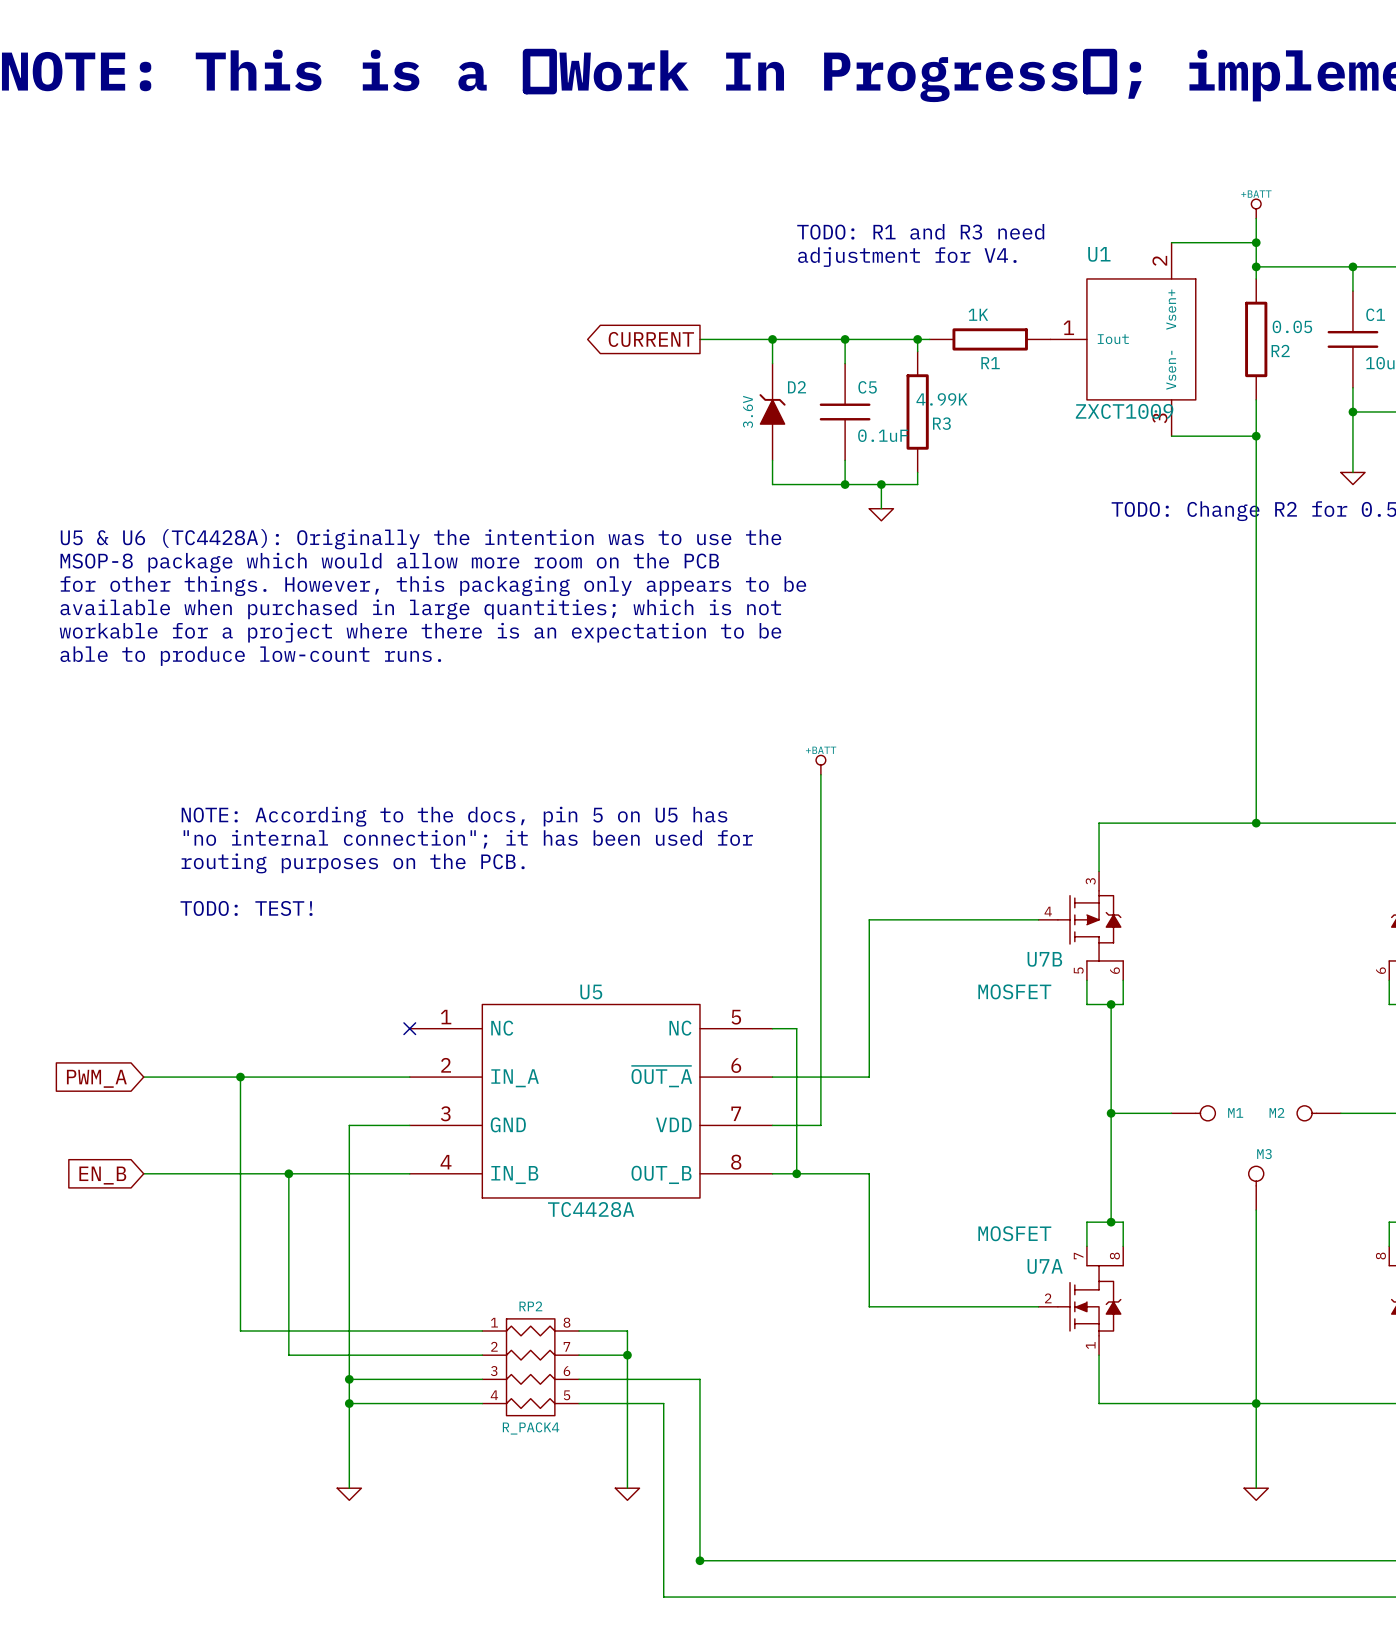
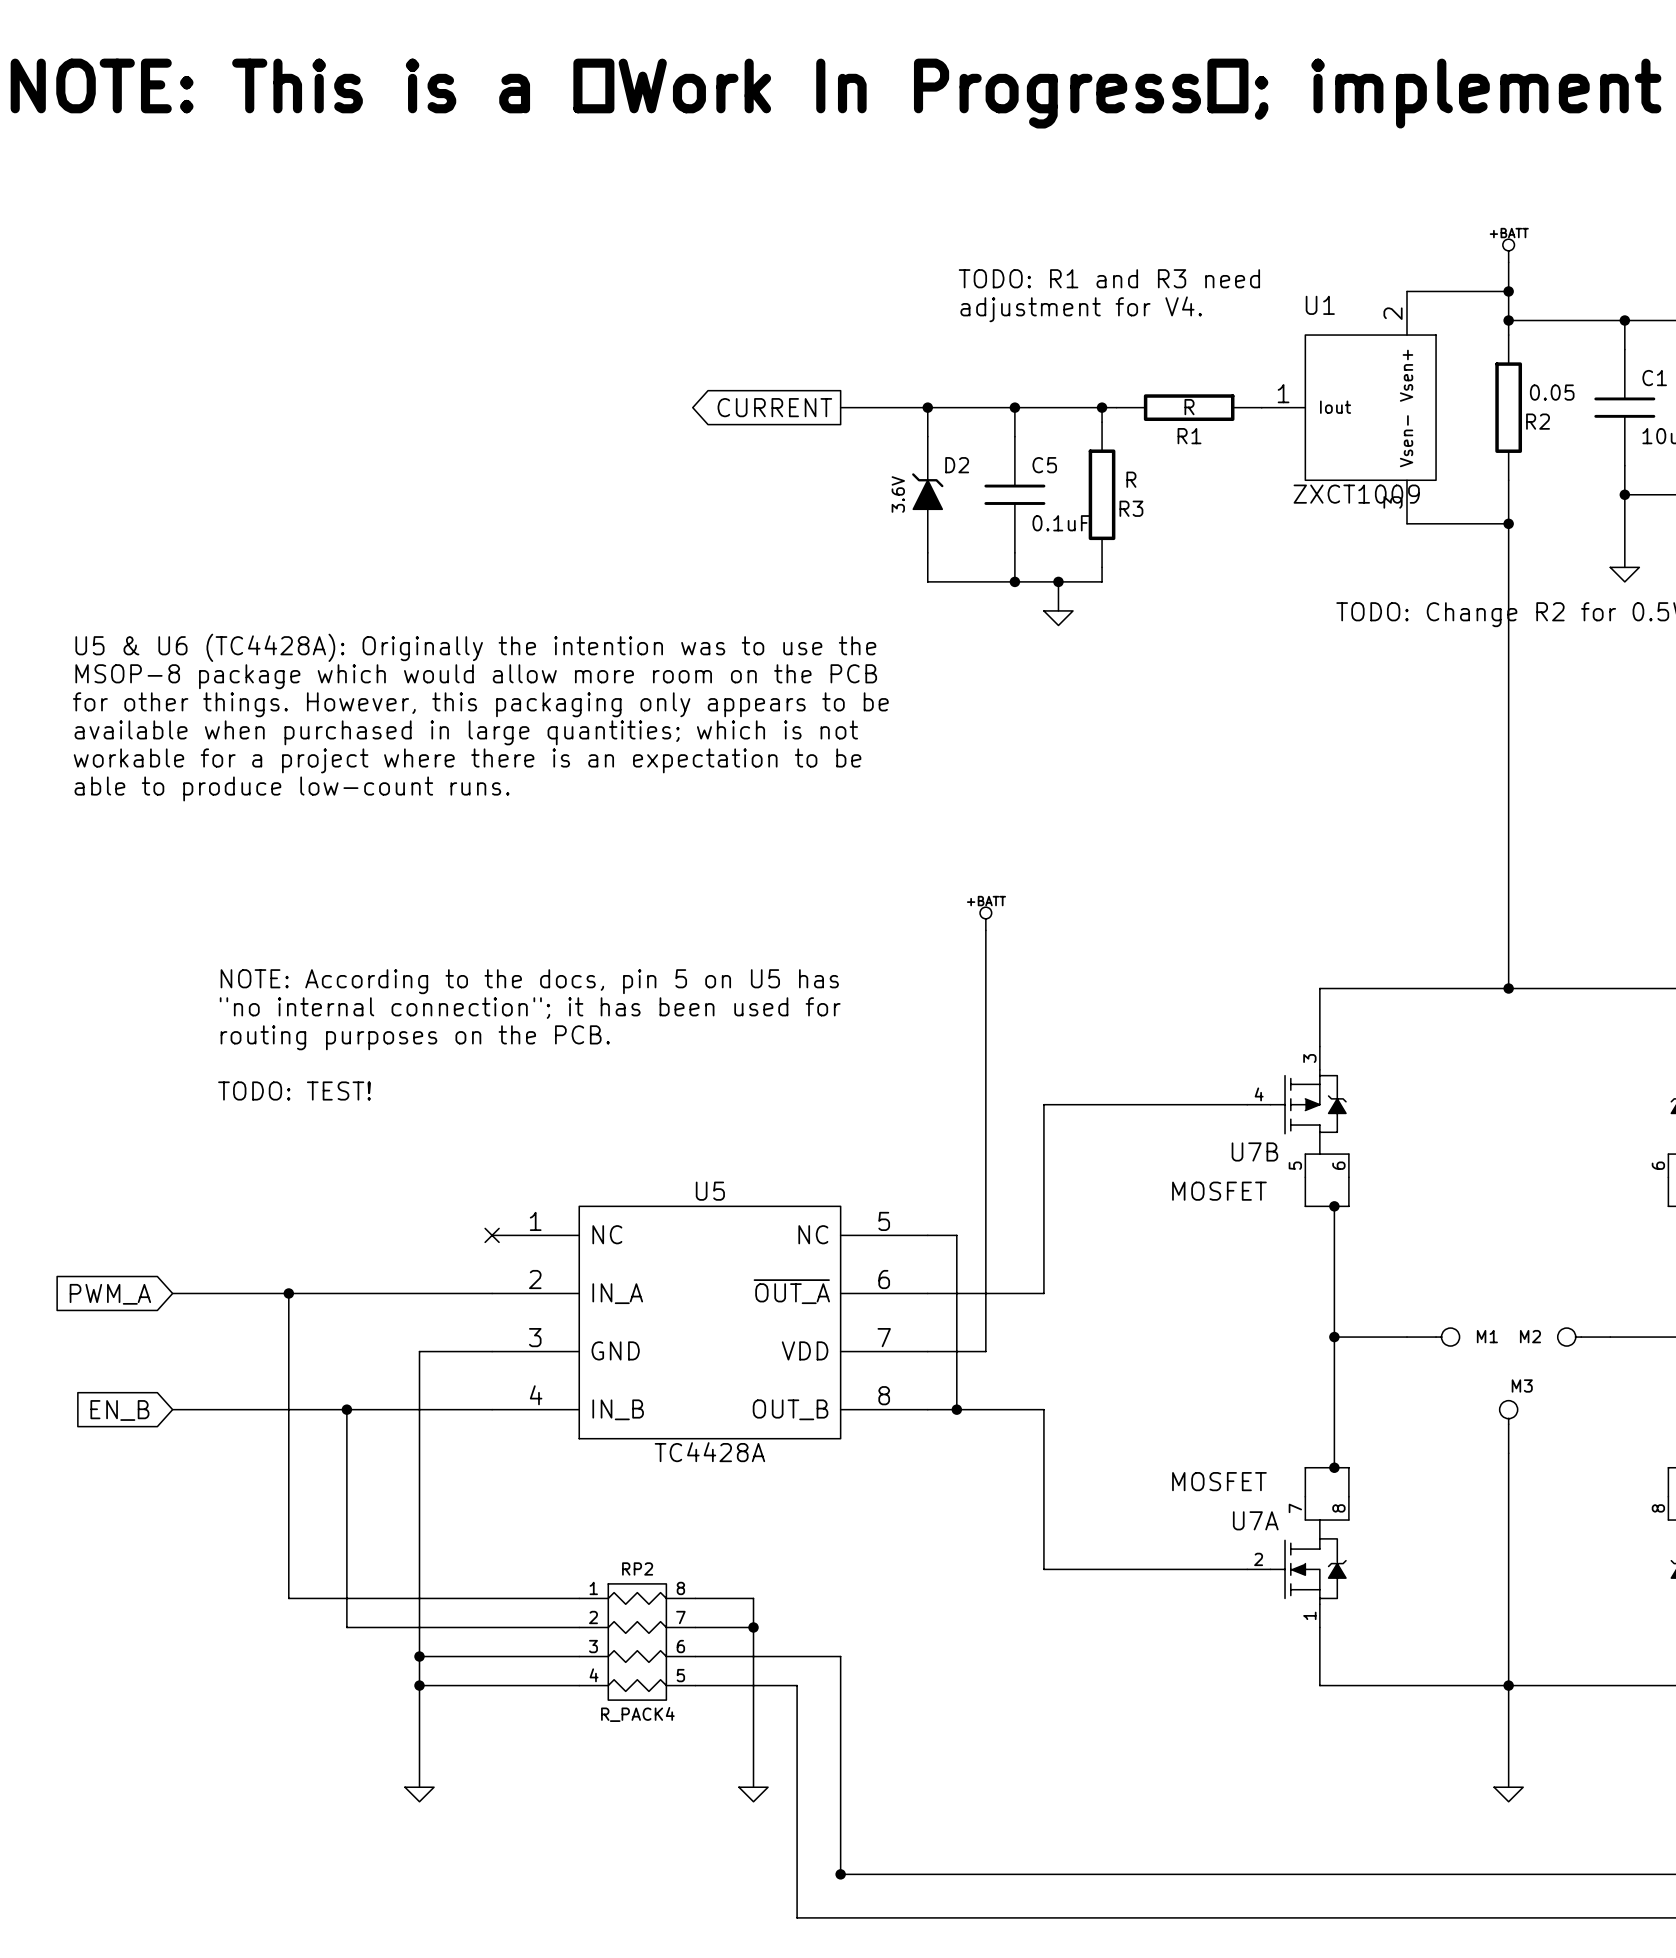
R1 value: 1K (978, 314) -> R (1189, 407)
R3 value: 4.99K (941, 399) -> R (1131, 479)

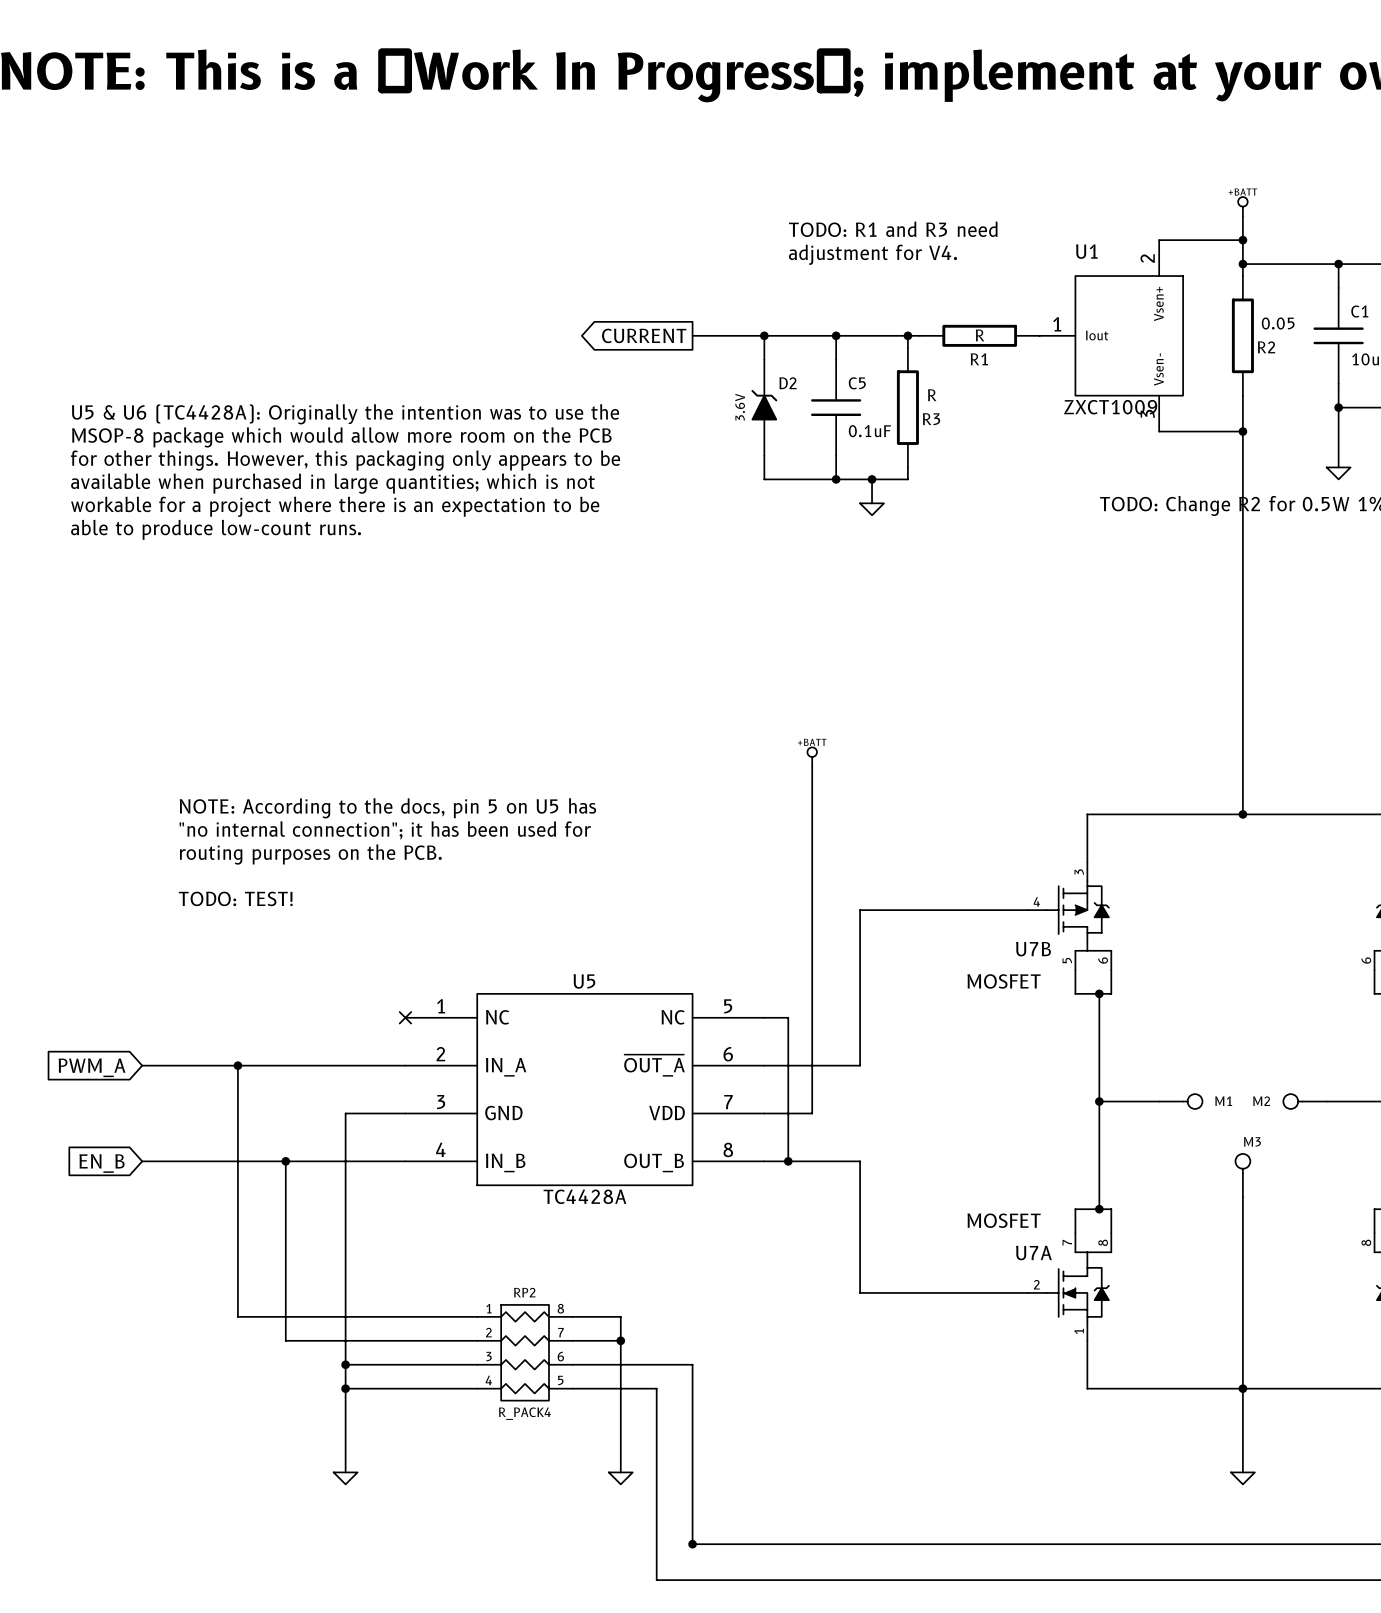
text position: U5 & U6 (TC4428A): Originally the intention was to use the (475, 647) -> U5 & U6 (TC4428A): Originally the intention was to use the (345, 414)
text position: MSOP-8 package which would allow more room on the PCB (476, 676) -> MSOP-8 package which would allow more room on the PCB (341, 437)
text position: for other things. However, this packaging only appears to be (480, 704) -> for other things. However, this packaging only appears to be (345, 460)
text position: available when purchased in large quantities; which is not (466, 732) -> available when purchased in large quantities; which is not (332, 483)
text position: workable for a project where there is an expectation to be (467, 760) -> workable for a project where there is an expectation to be (335, 506)
text position: able to produce low-count runs. (292, 788) -> able to produce low-count runs. (216, 529)

